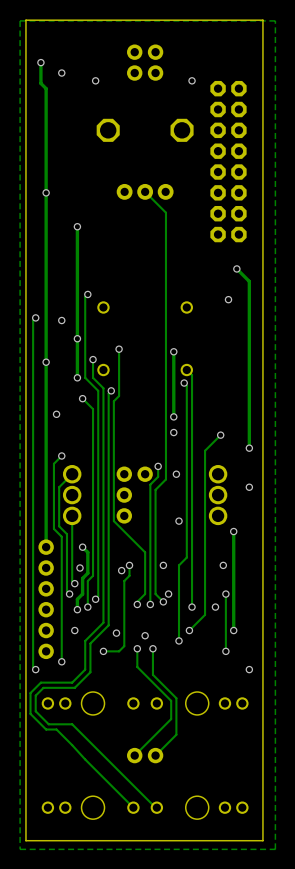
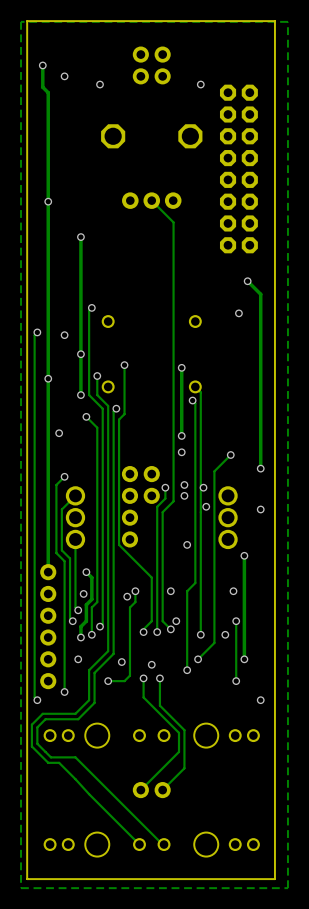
part: none -> (140, 474)
via: none -> (184, 484)
via: none -> (203, 487)
via: none -> (206, 506)

